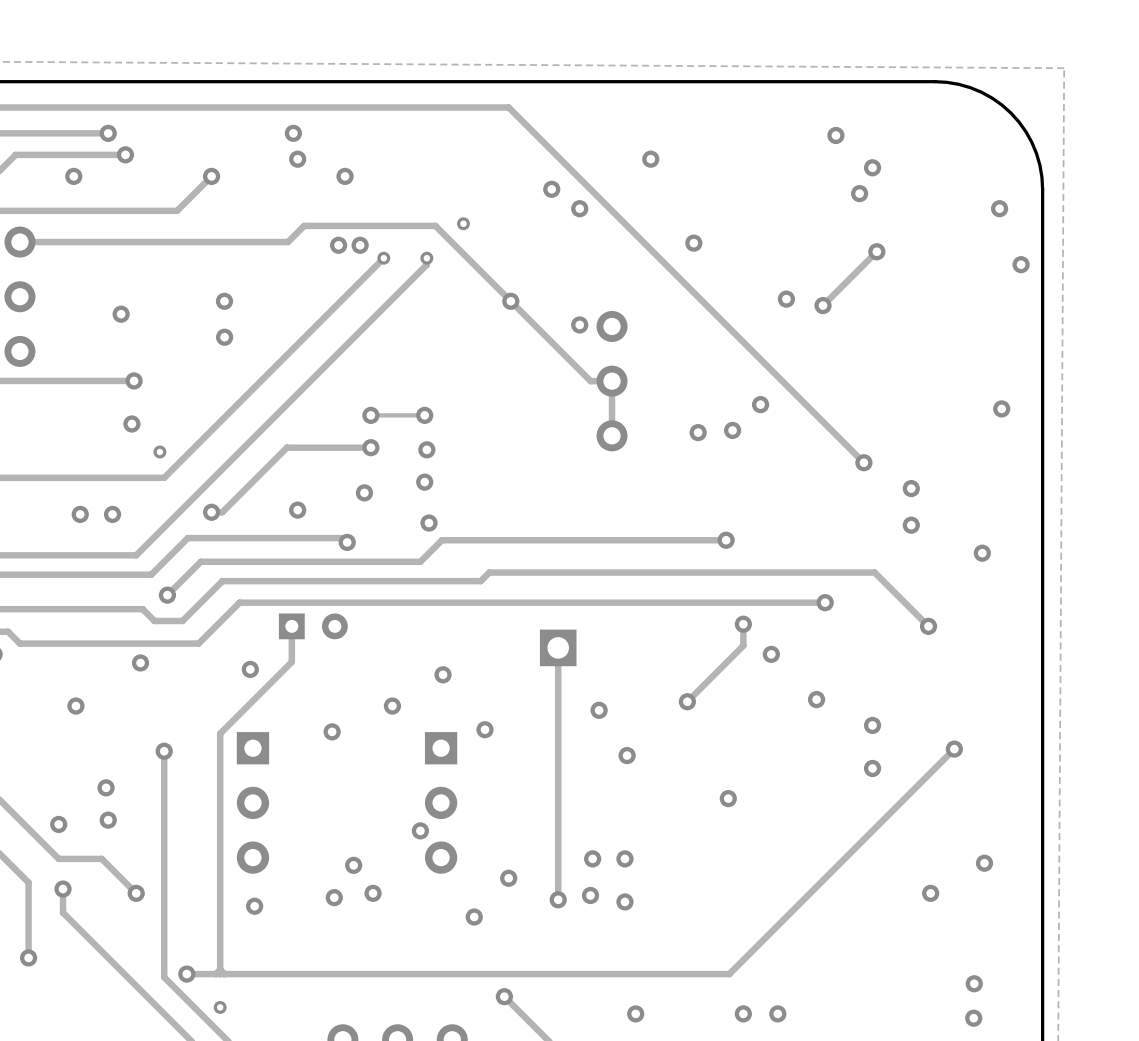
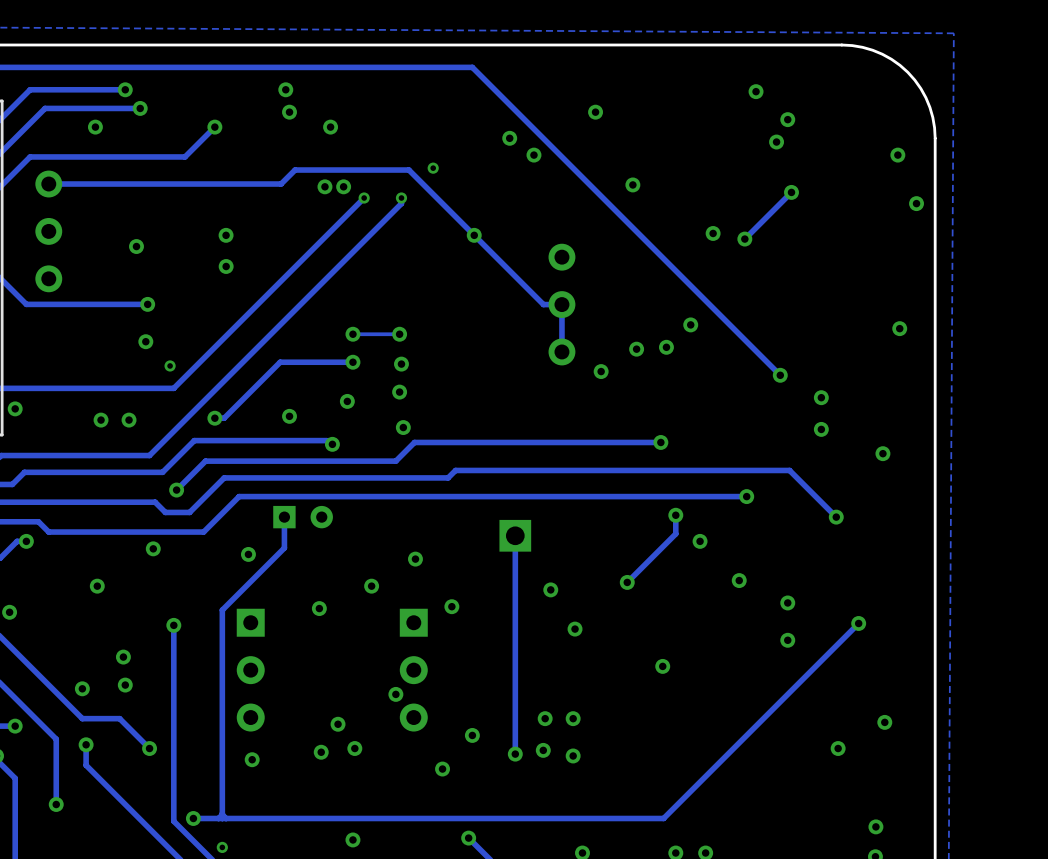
via: (579, 324) -> none
via: none -> (601, 371)
via: none -> (352, 839)

